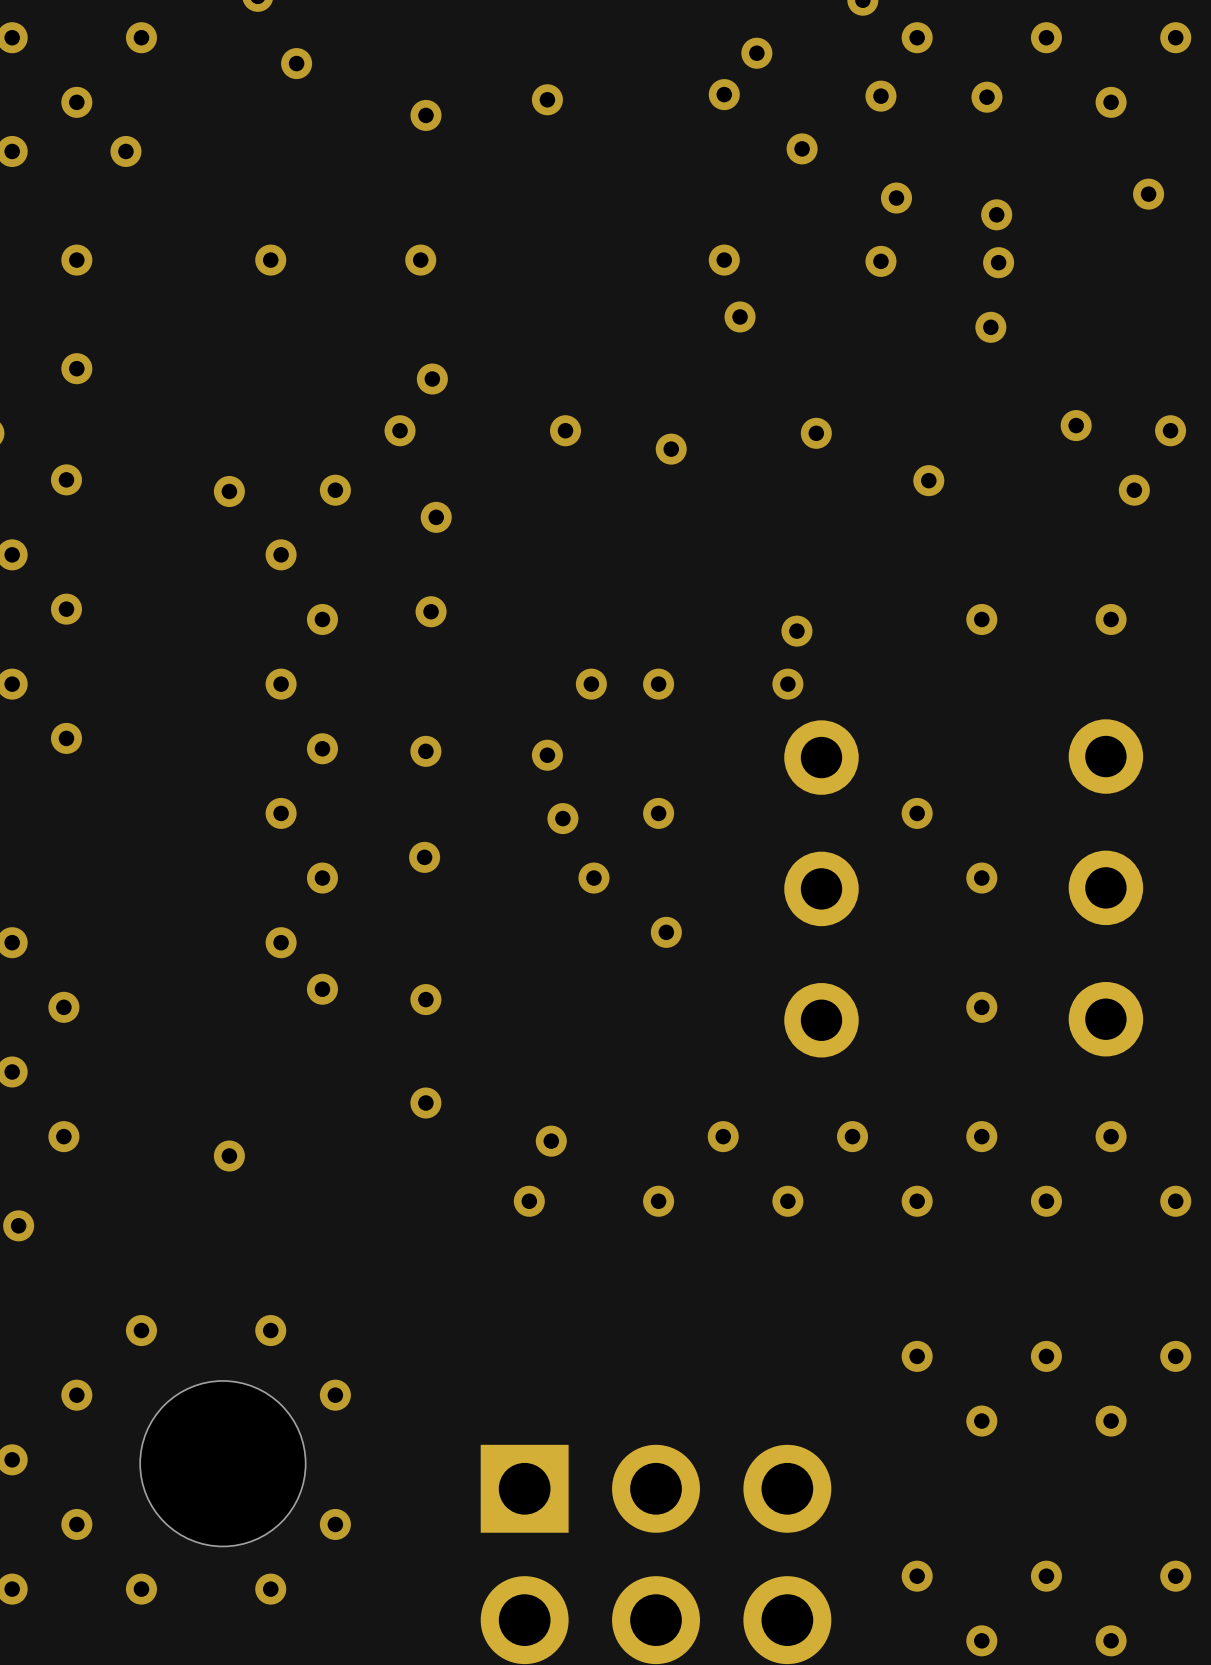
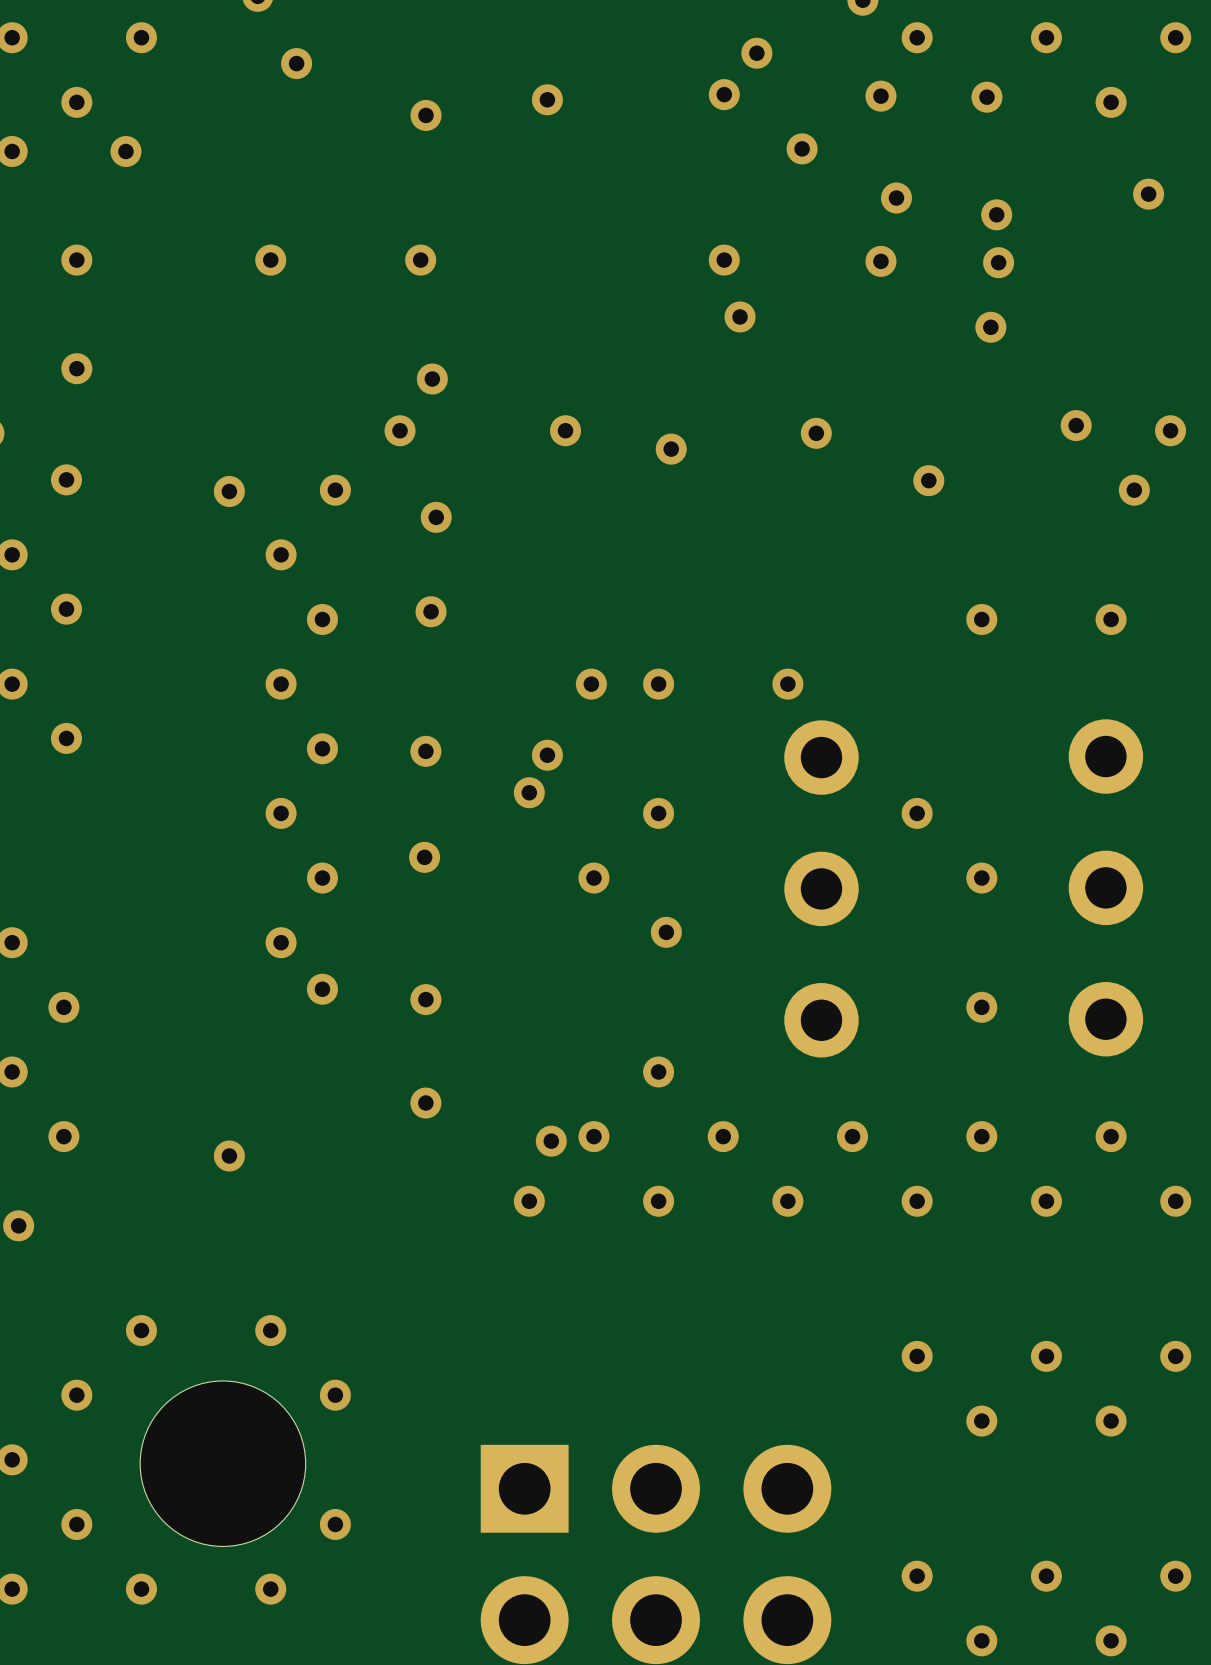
via: (796, 631) -> none
via position: (562, 818) -> (529, 792)
via: none -> (658, 1071)
via: none -> (593, 1136)

